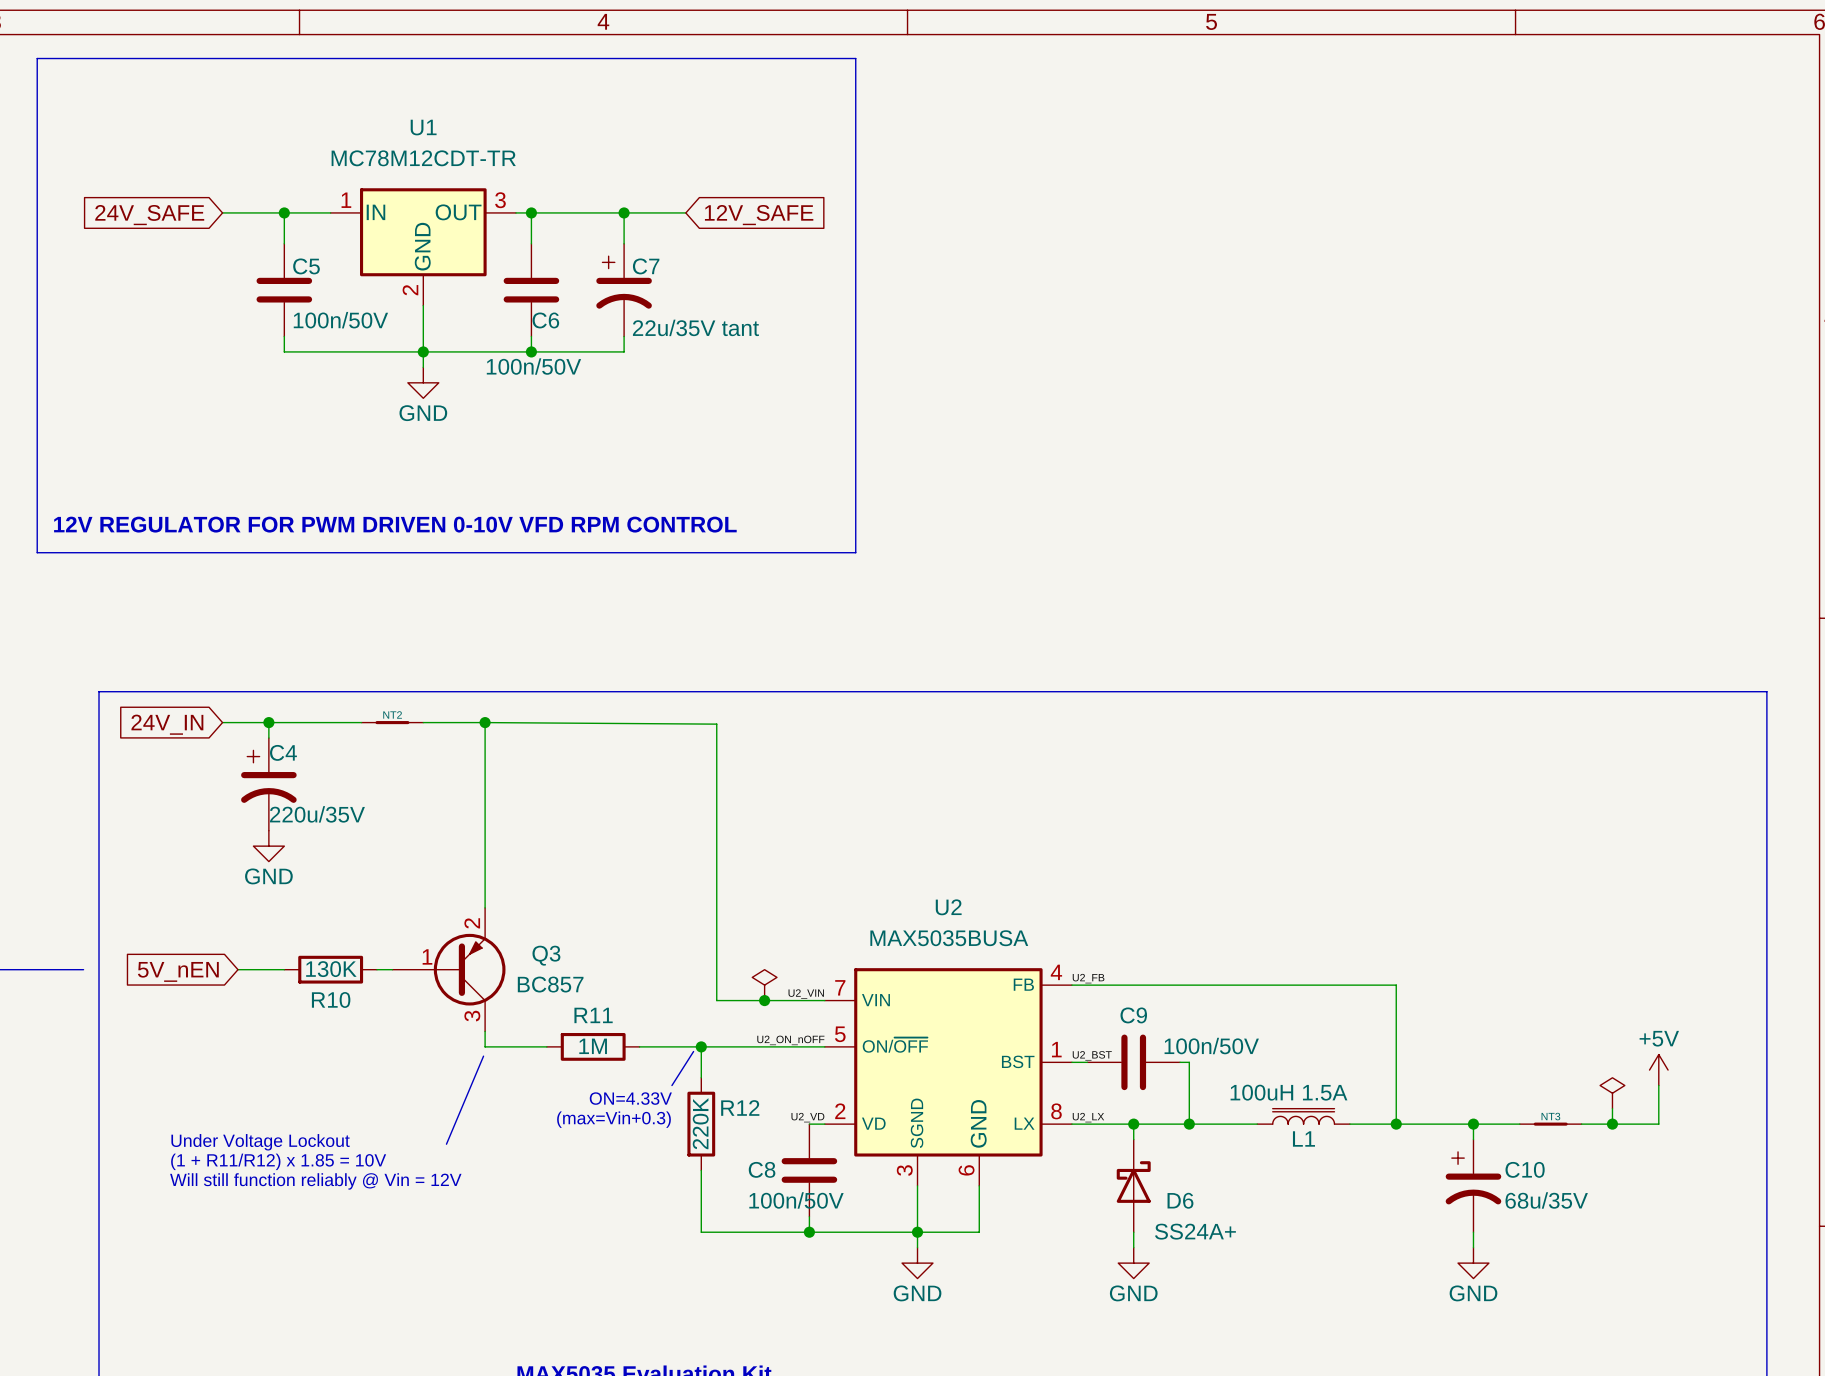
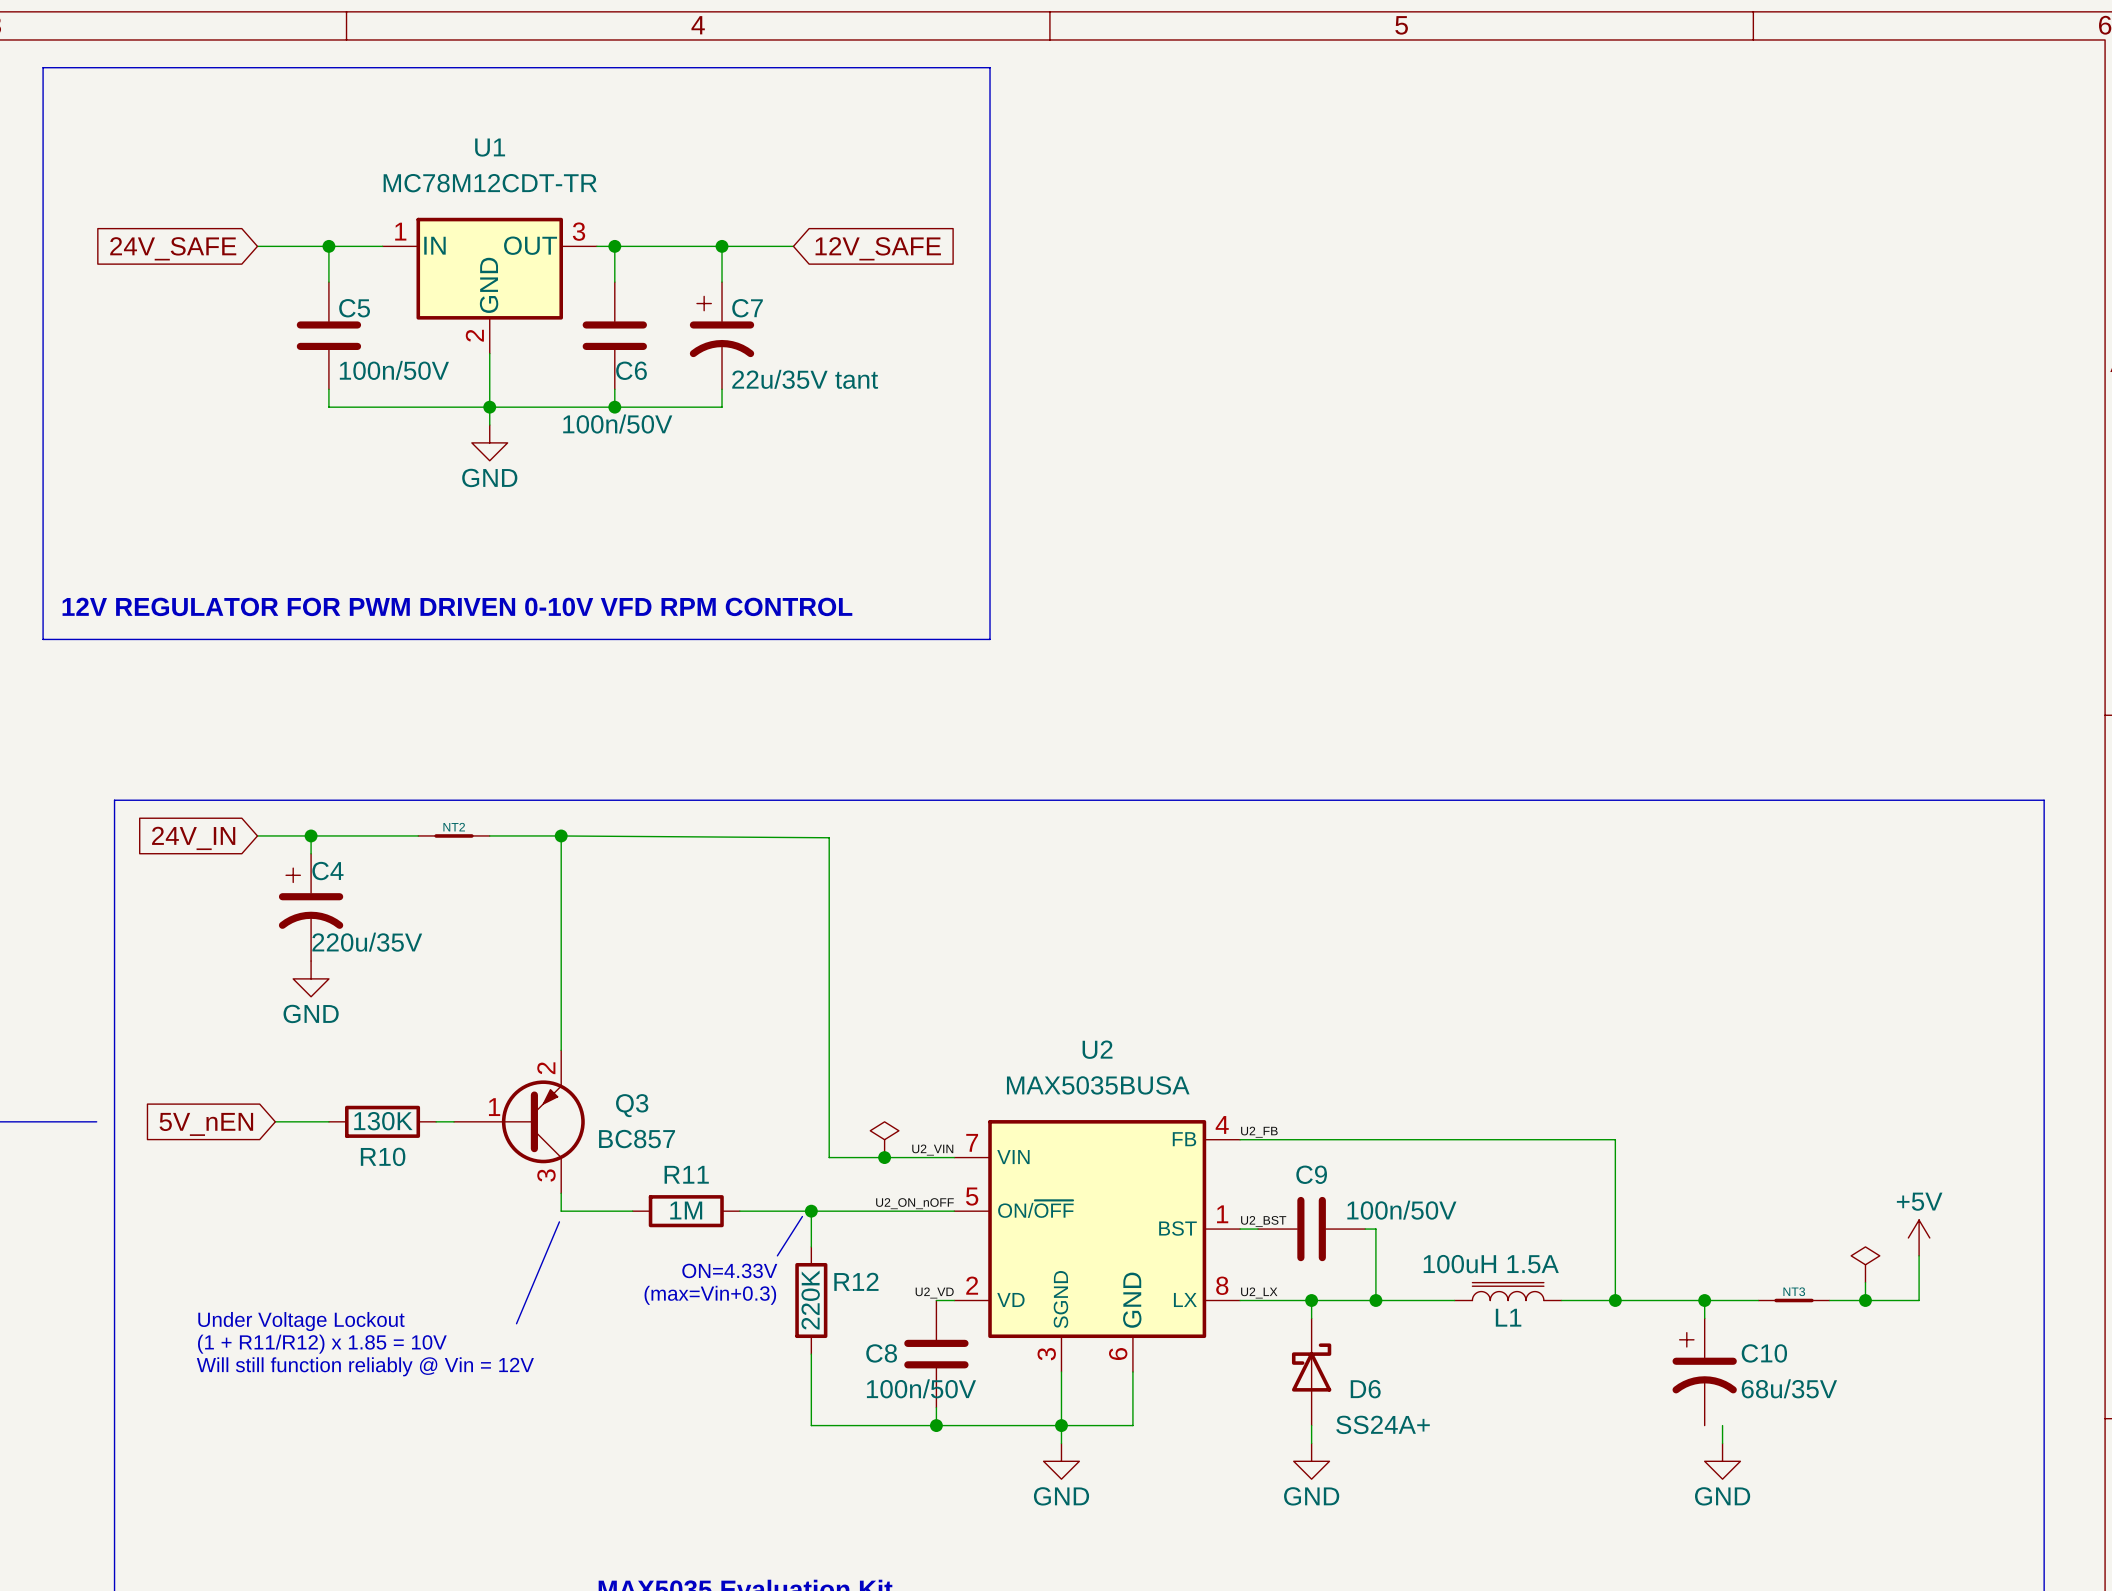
wire: (1473, 1232) (1473, 1247) -> (1722, 1425) (1722, 1443)
power symbol position: GND (1473, 1263) -> GND (1722, 1461)

